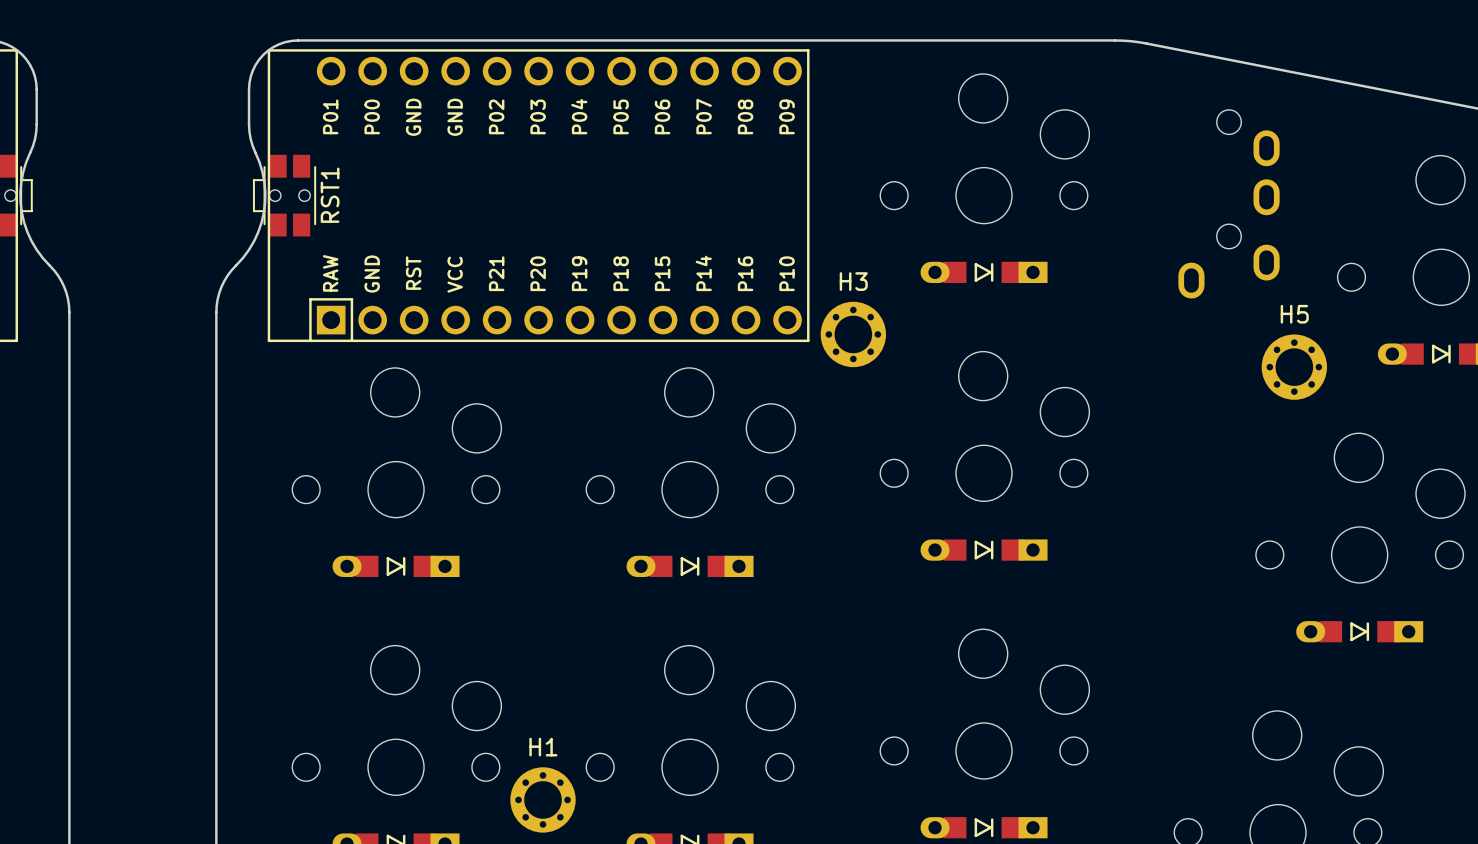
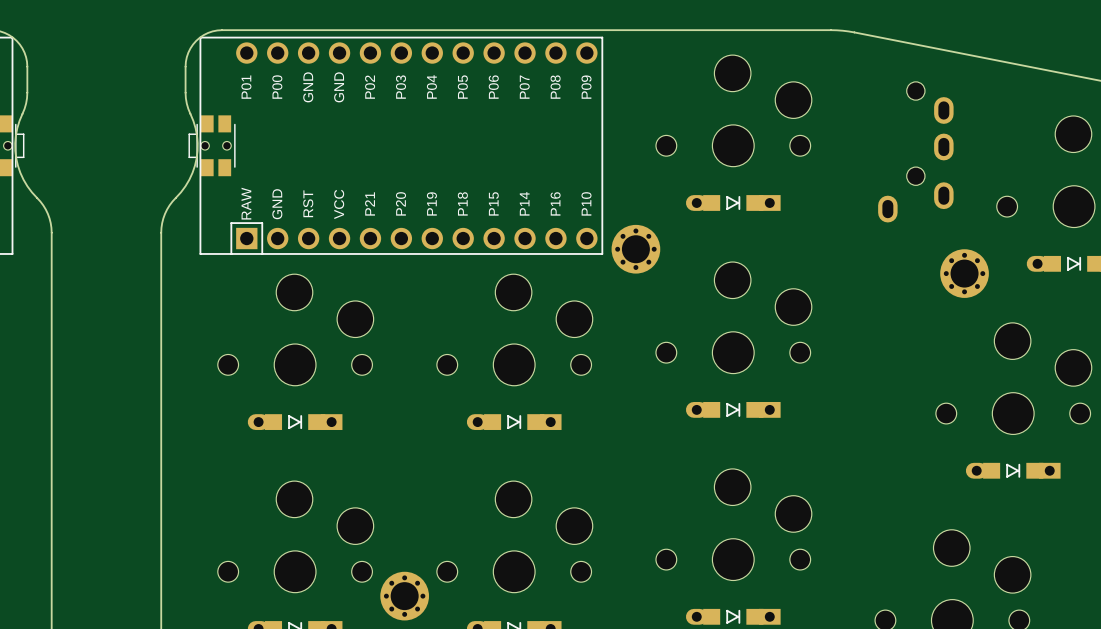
RST1 name: RST1 (330, 195) -> none
H3 name: H3 (853, 281) -> none
H5 name: H5 (1294, 314) -> none
H1 name: H1 (543, 747) -> none

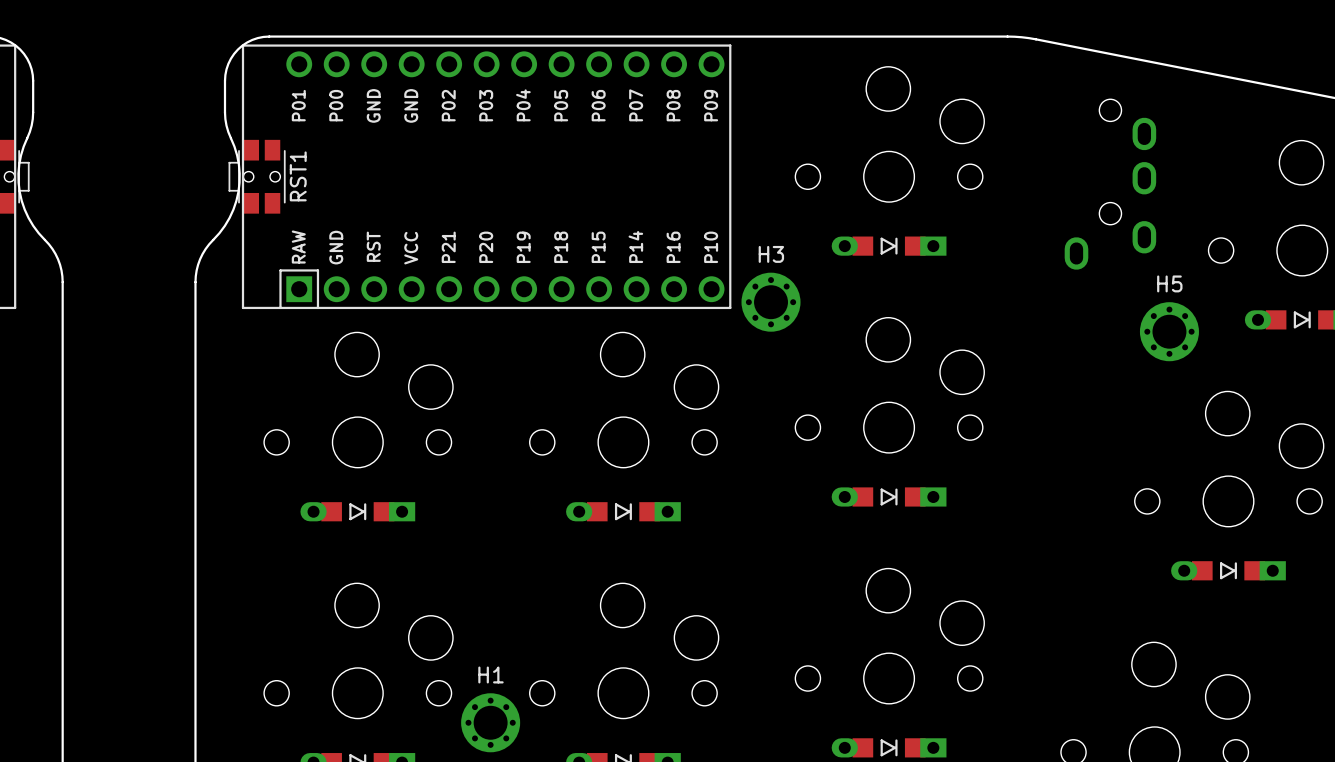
RST1 name: none -> RST1 (298, 176)
H3 name: none -> H3 (771, 254)
H5 name: none -> H5 (1169, 283)
H1 name: none -> H1 (490, 674)

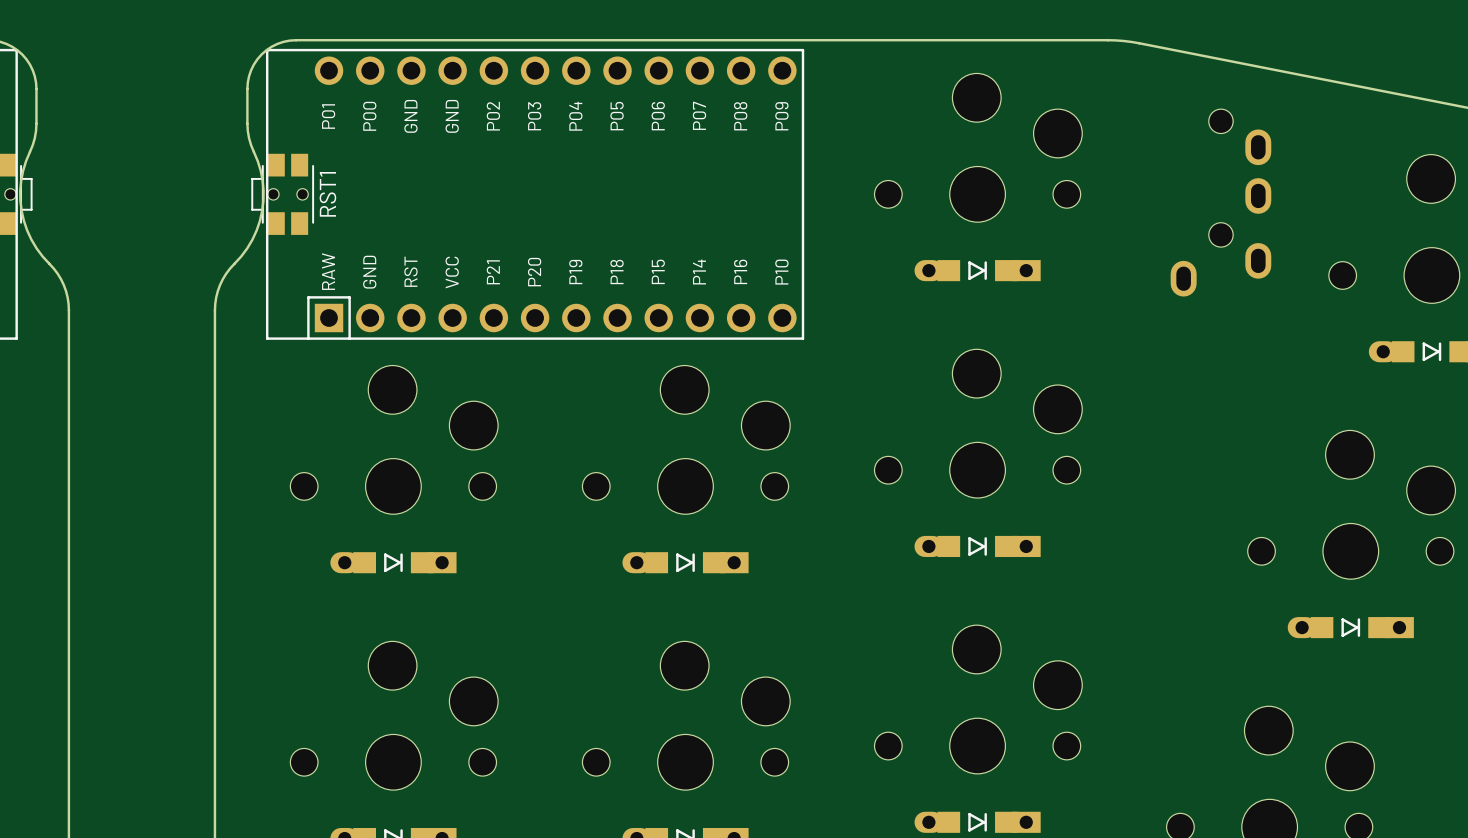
H3: (771, 302) -> none
H5: (1169, 331) -> none
H1: (490, 722) -> none

